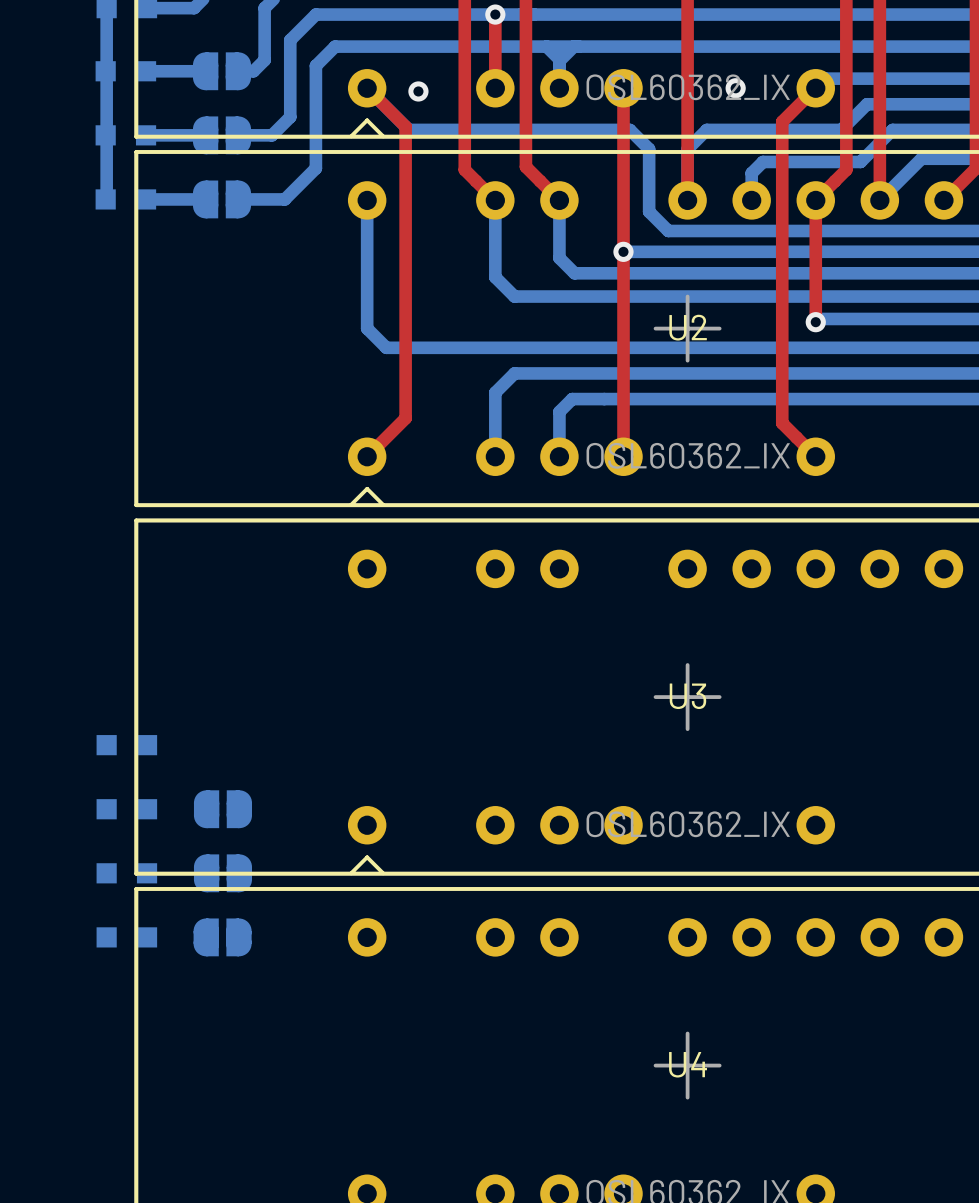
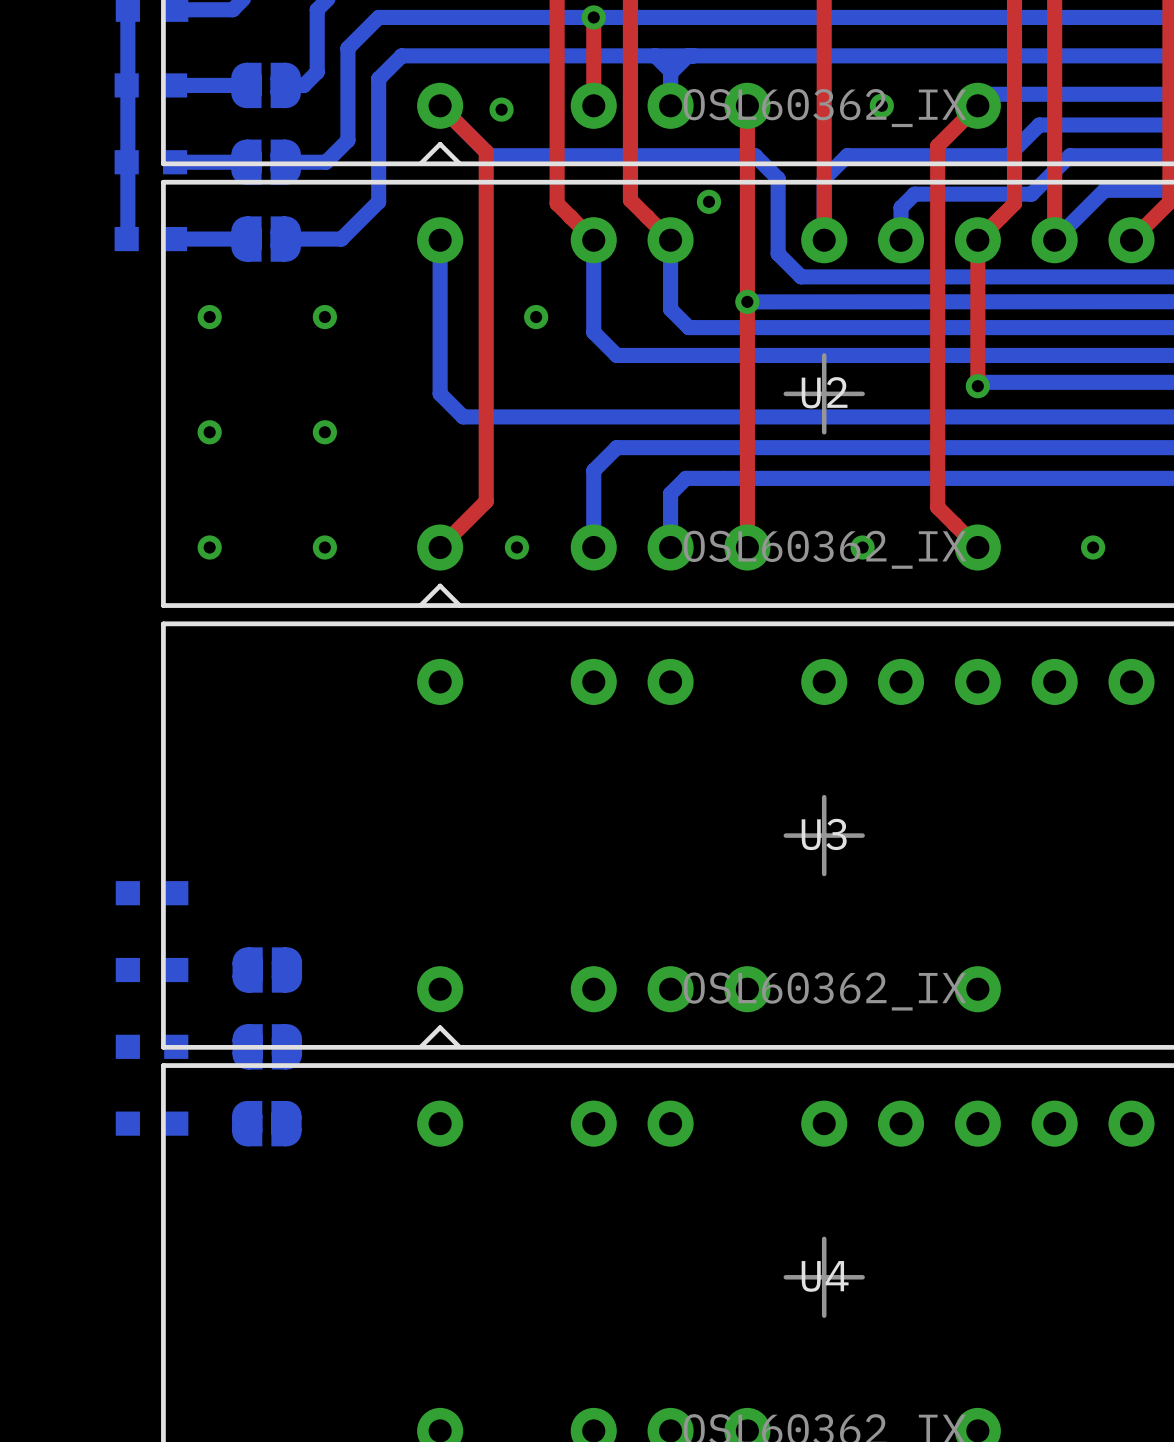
via: none -> (708, 201)
via: none -> (209, 317)
via: none -> (324, 317)
via: none -> (536, 317)
via: none -> (209, 432)
via: none -> (324, 432)
via: none -> (209, 547)
via: none -> (324, 547)
via: none -> (516, 547)
via: none -> (862, 547)
via: none -> (1093, 547)

